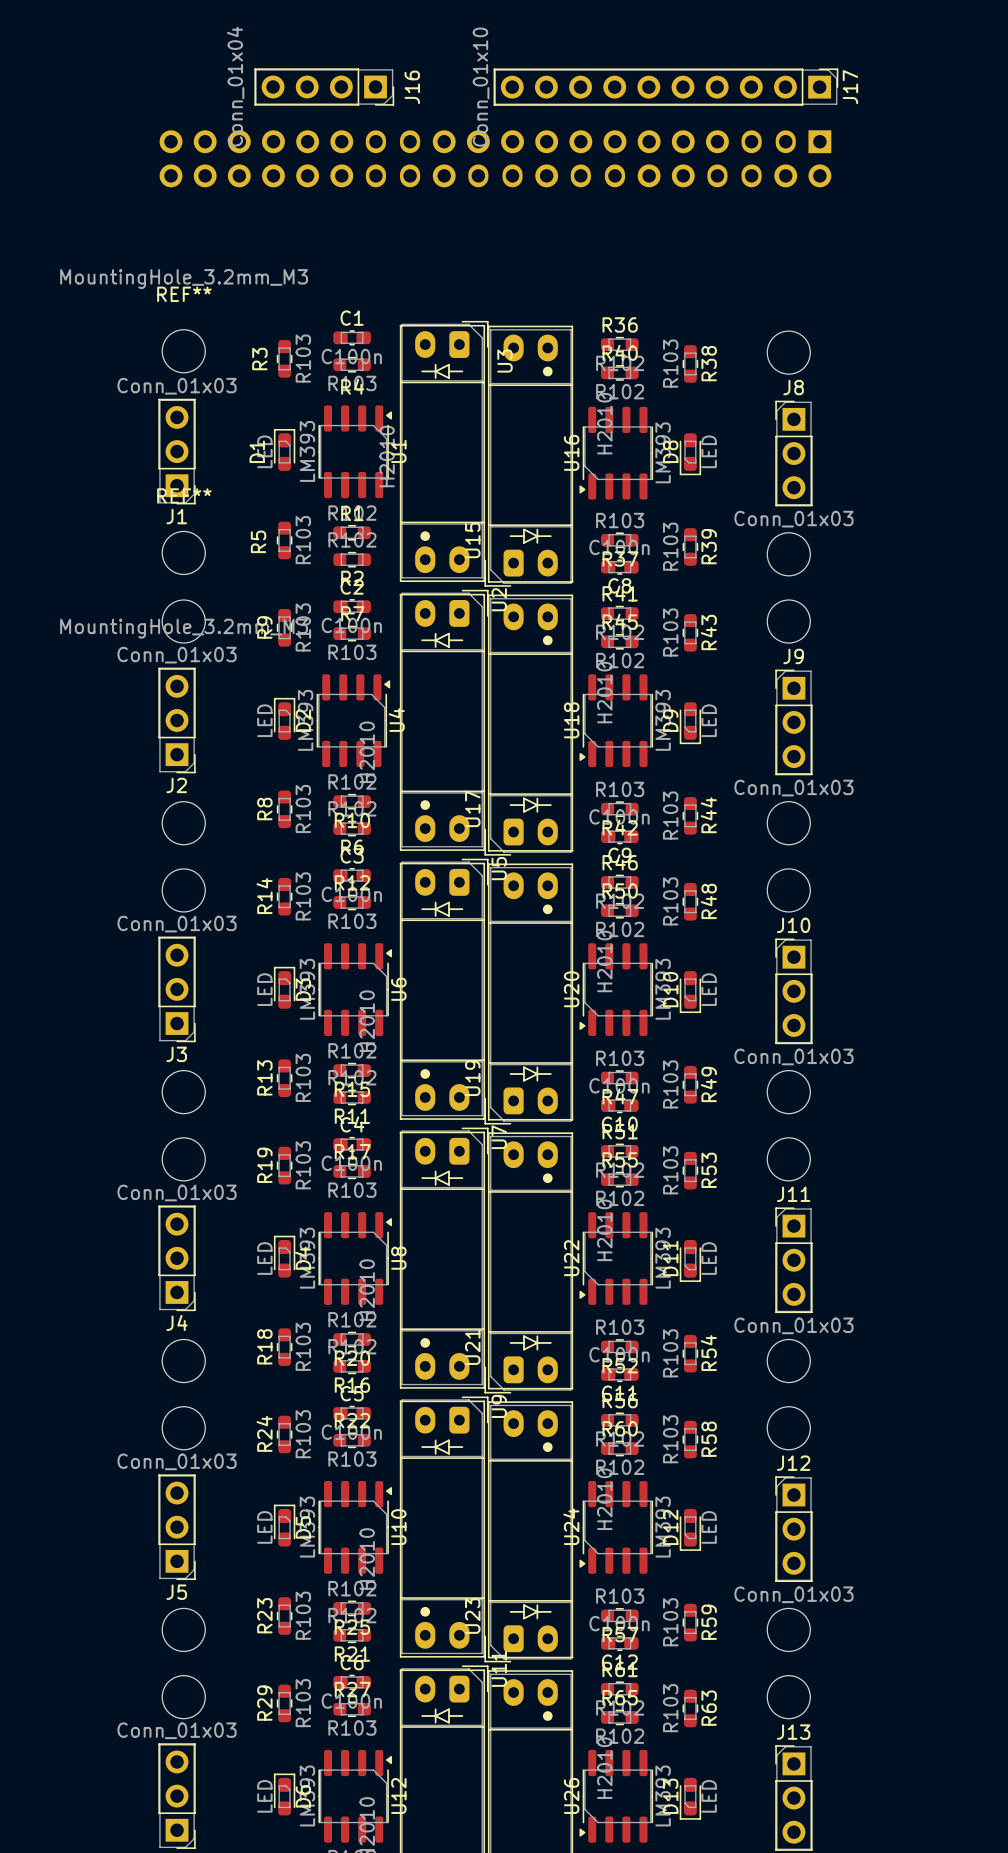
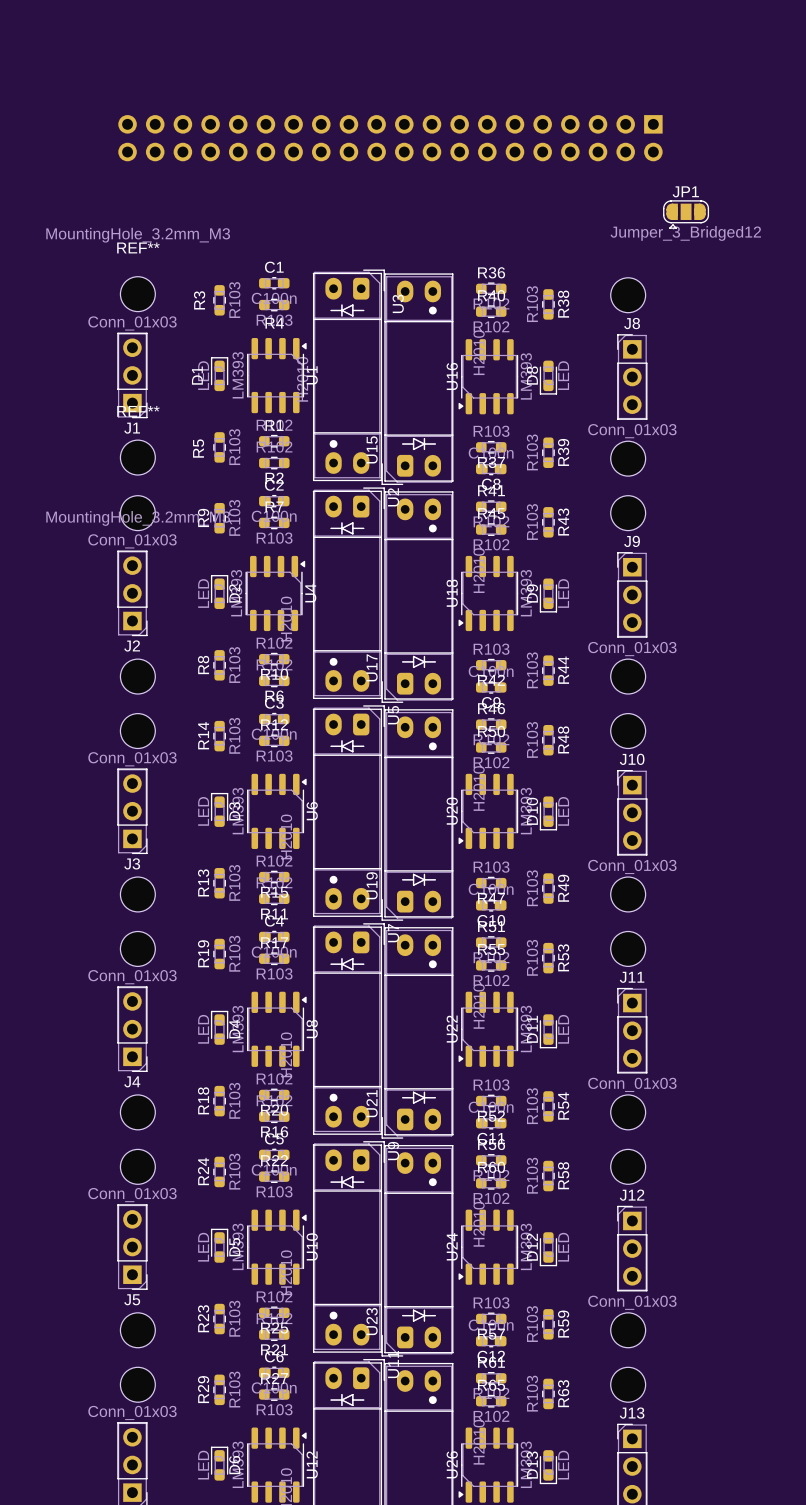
J16: Conn_01x04 (324, 87) -> none
J17: Conn_01x10 (665, 87) -> none
part footprint: [159, 130, 832, 188] -> [118, 115, 663, 162]
JP1: none -> Jumper_3_Bridged12 (686, 214)

